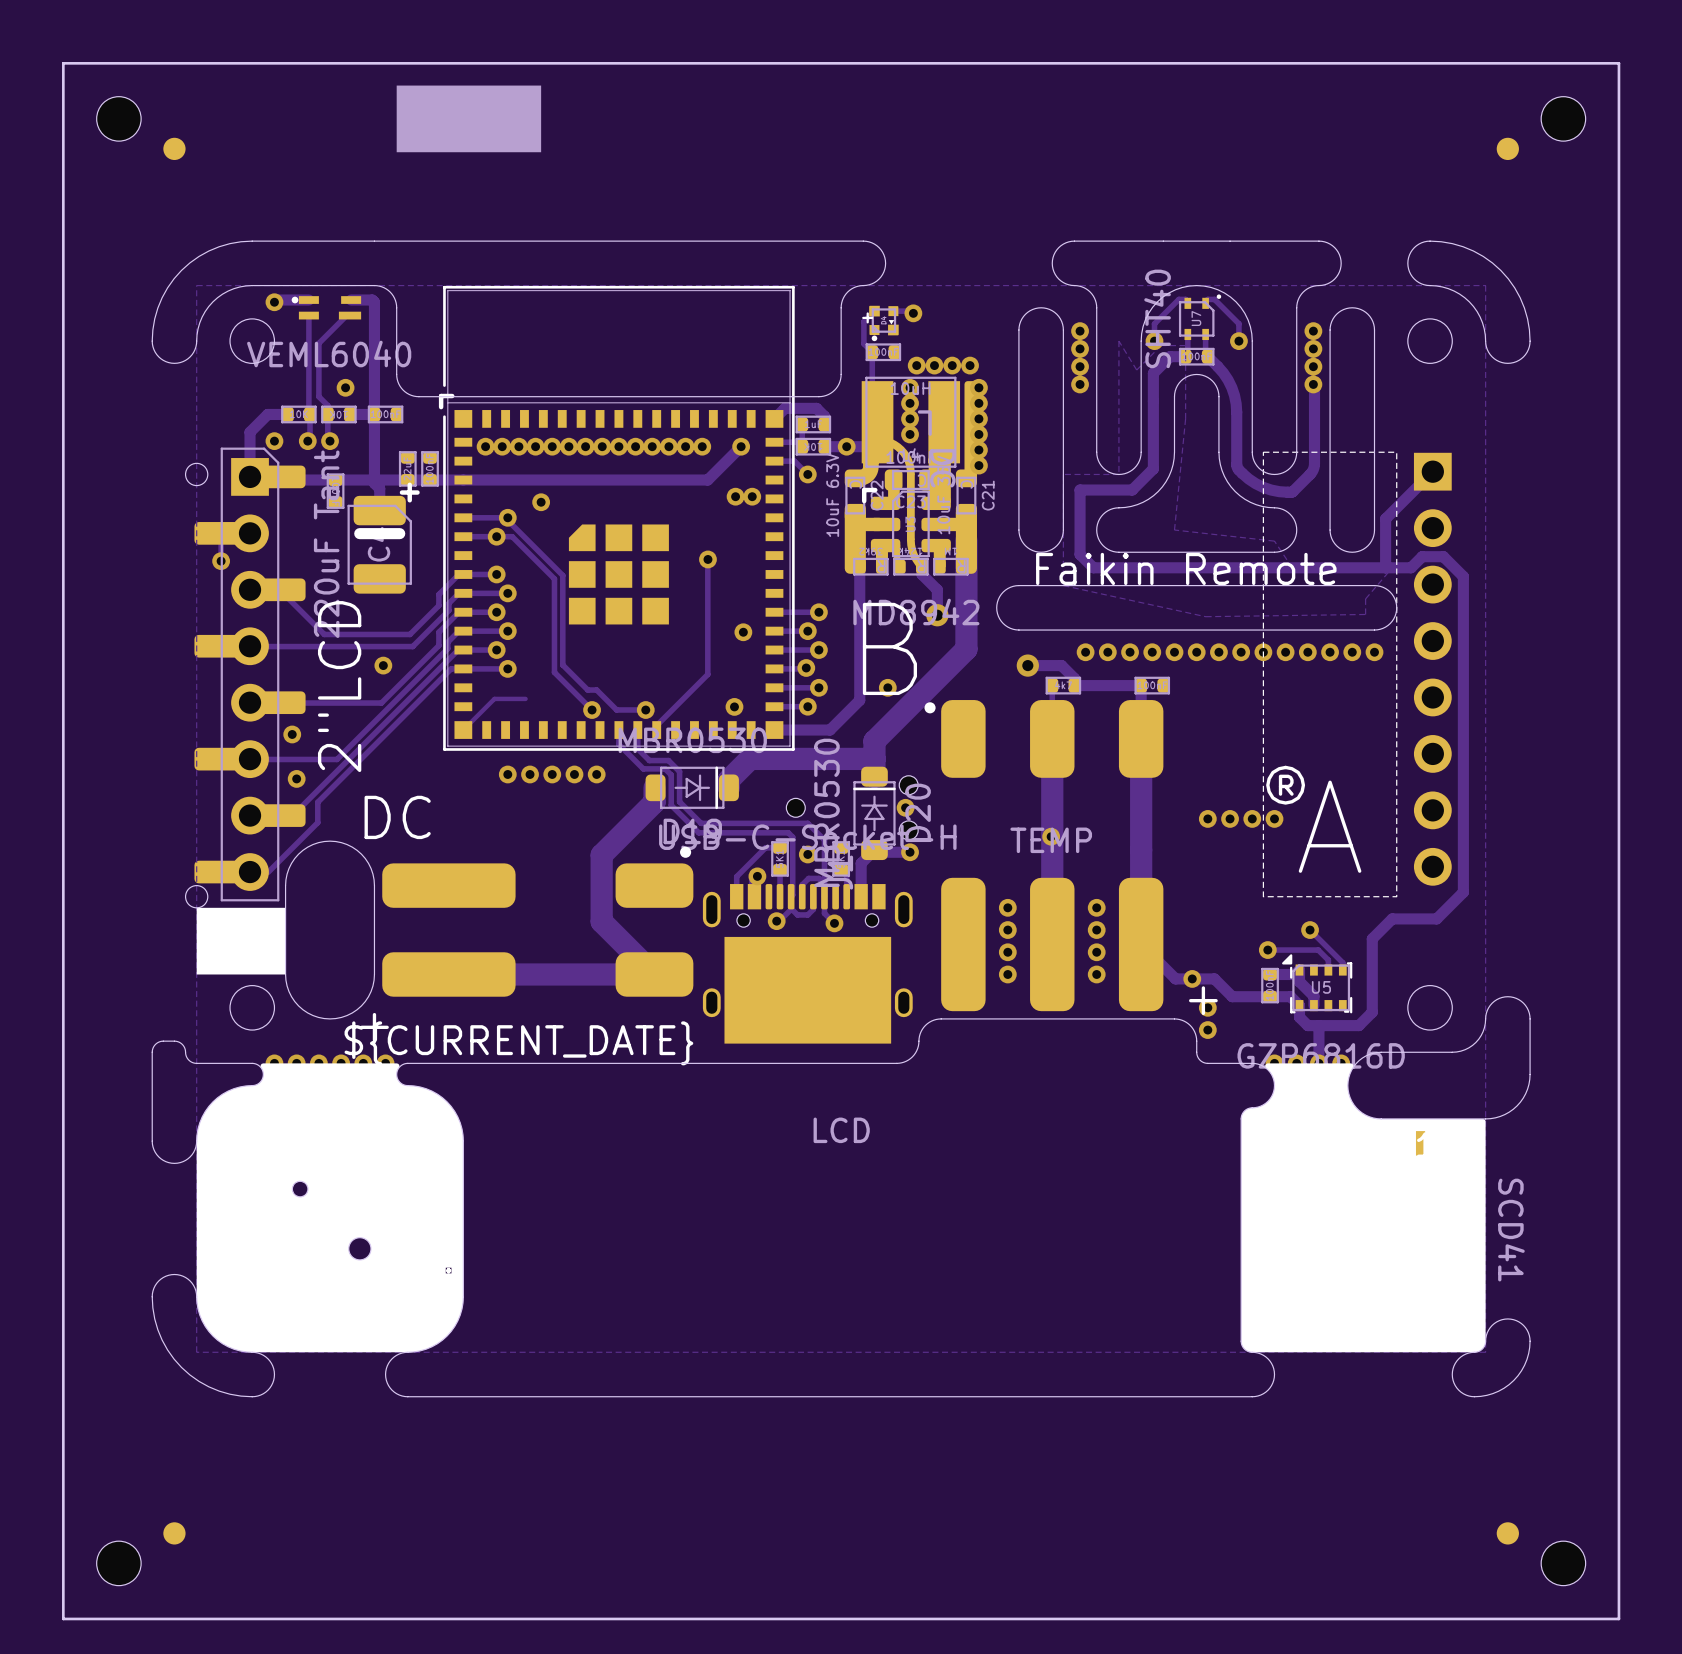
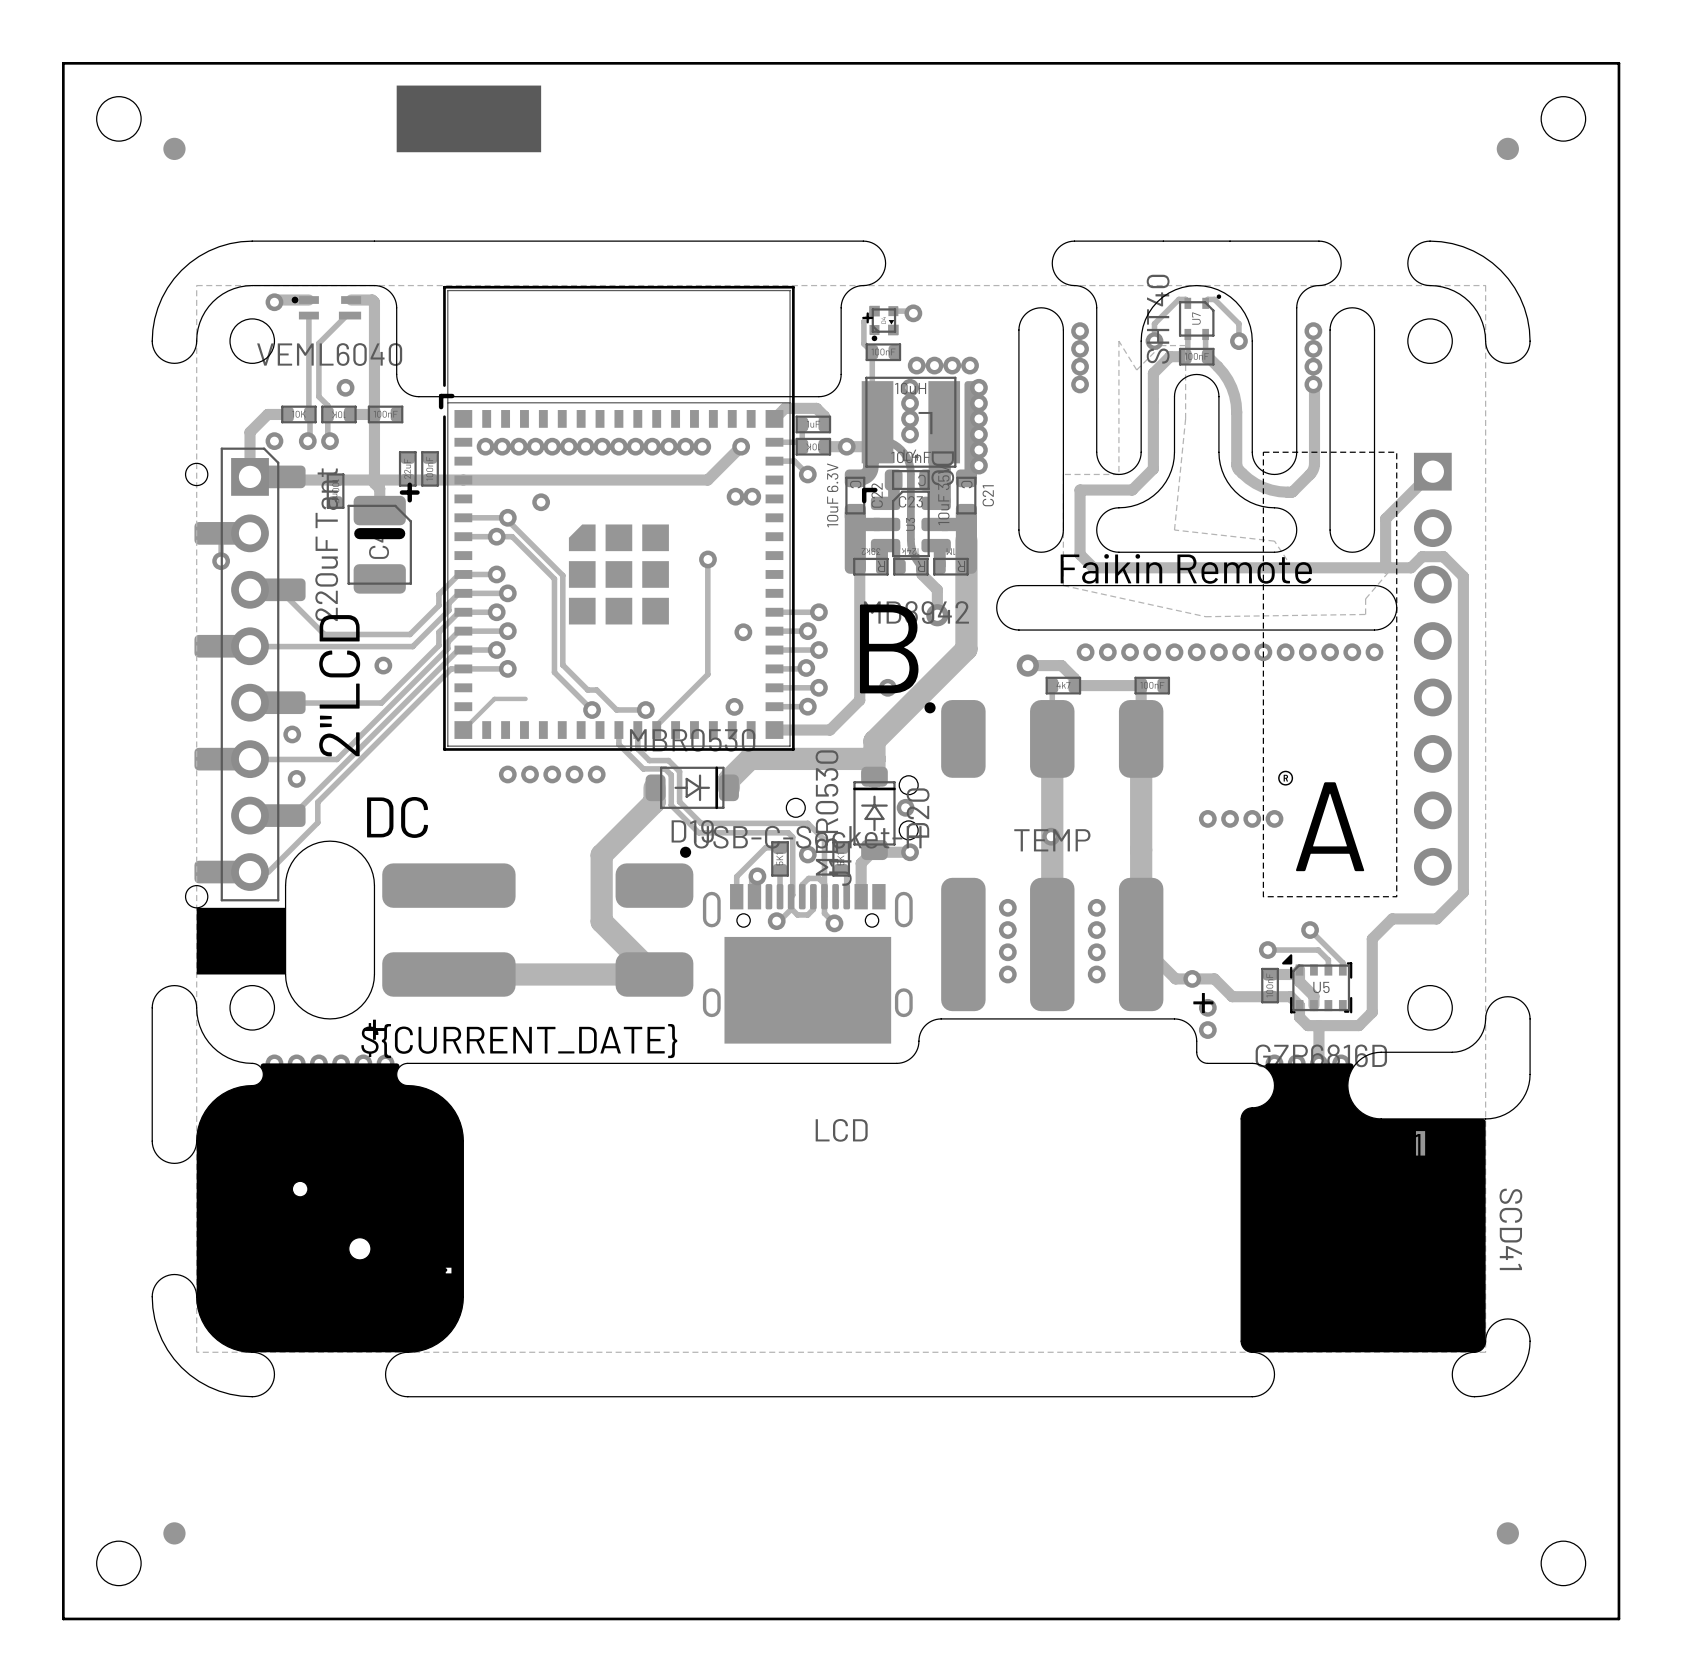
board edge: (152, 1052) (154, 1045) (159, 1042) (175, 1041) (183, 1045) (187, 1057) (193, 1063) (252, 1063) -> (152, 1052) (153, 999) (163, 988) (177, 985) (187, 990) (193, 996) (199, 1026) (212, 1047) (233, 1060) (252, 1063)

